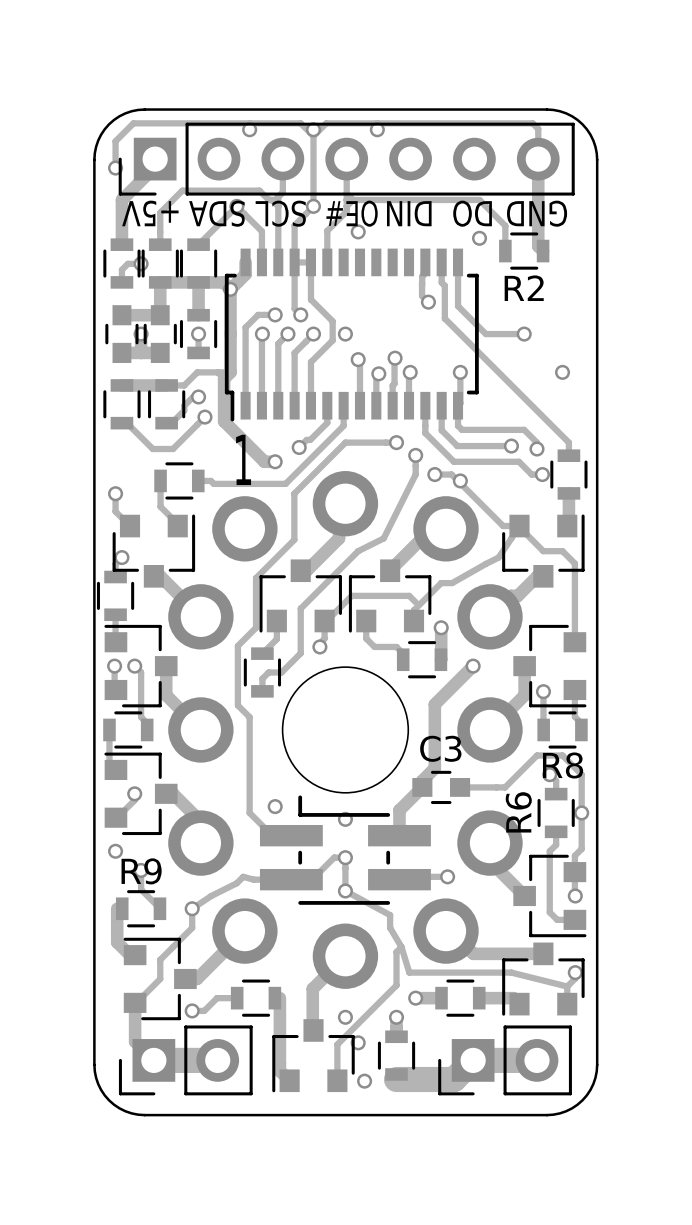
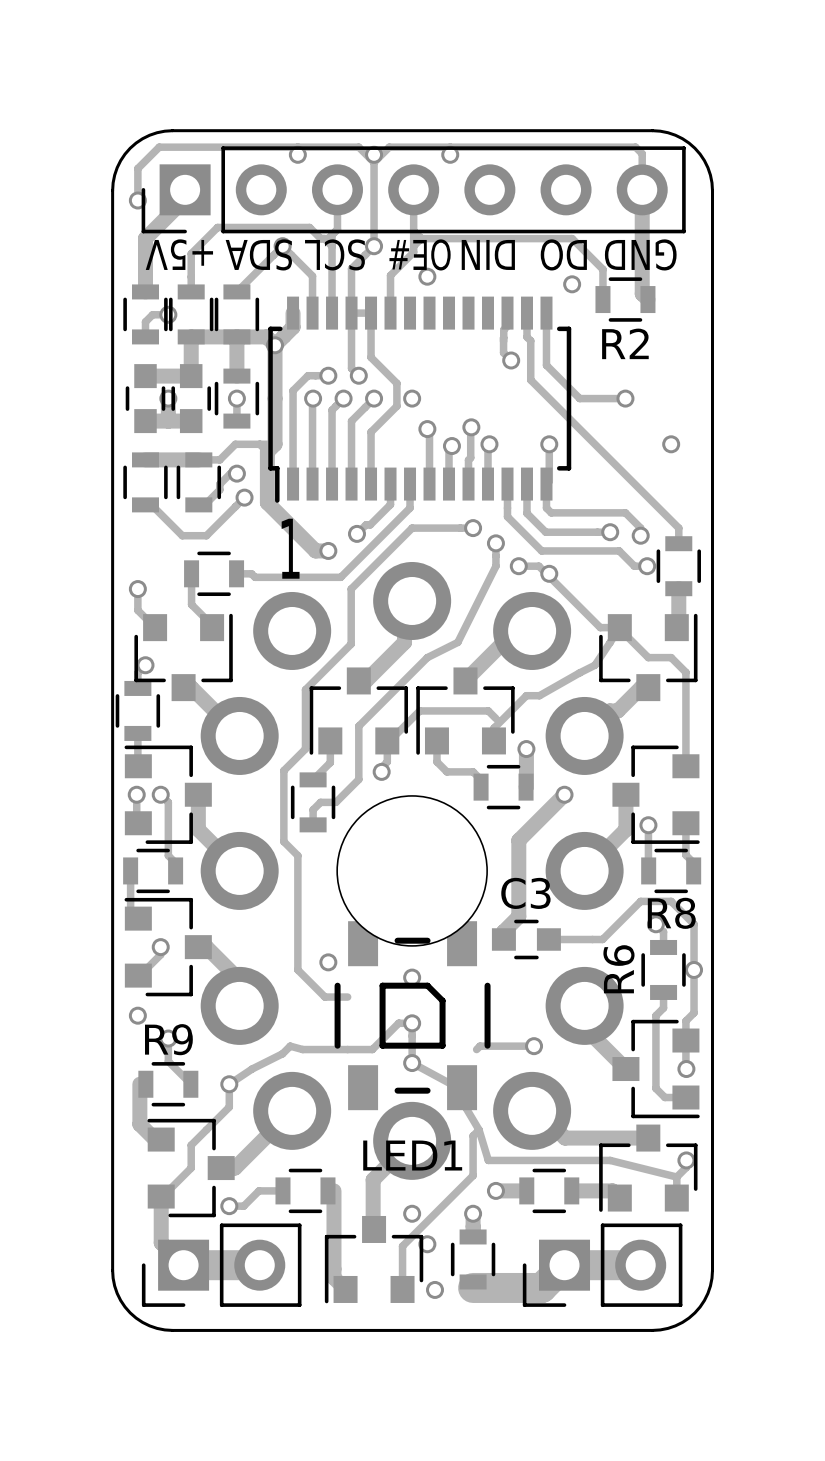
track: (422, 787) (399, 810) (399, 835) -> none
part: (345, 850) -> none
LED1: none -> (412, 1015)

